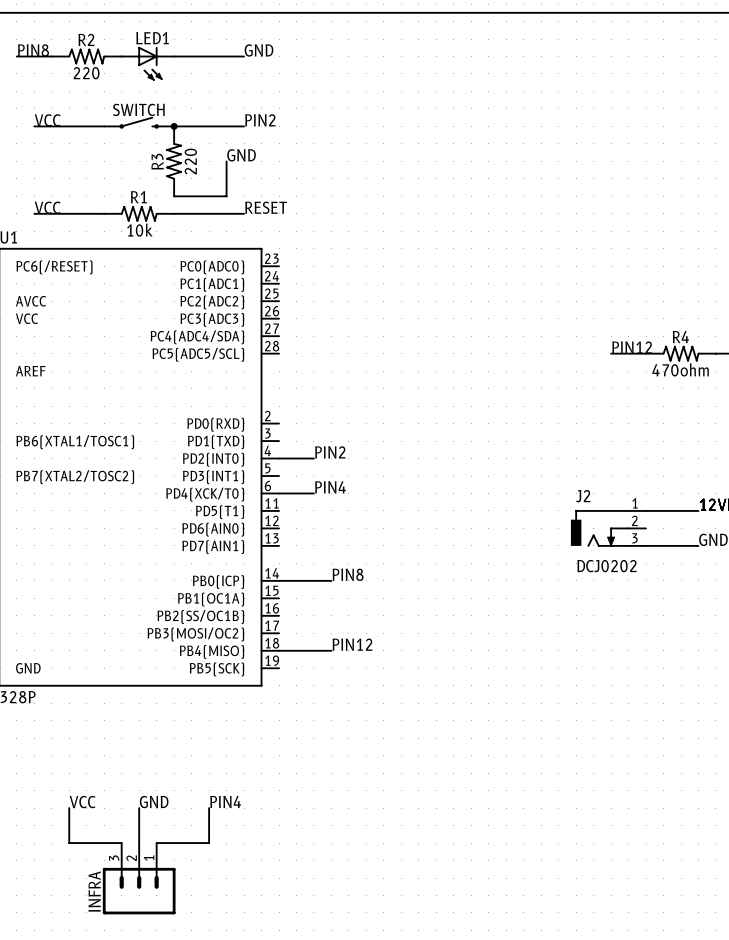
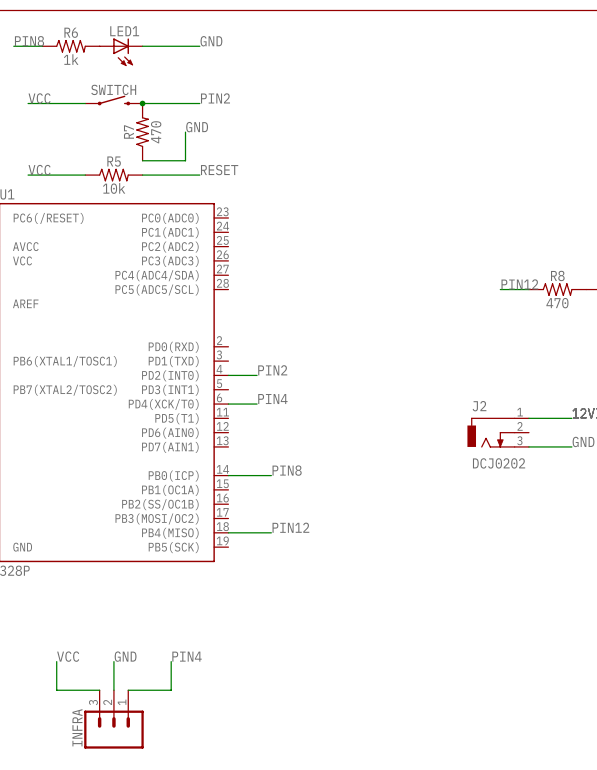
R2 name: R2 (86, 39) -> R6 (71, 32)
R2 value: 220 (86, 73) -> 1k (71, 59)
R3 name: R3 (157, 161) -> R7 (128, 132)
R3 value: 220 (190, 161) -> 470 (156, 132)
R1 name: R1 (138, 197) -> R5 (114, 161)
R4 name: R4 (680, 337) -> R8 (557, 275)
R4 value: 470ohm (680, 369) -> 470 (557, 303)

